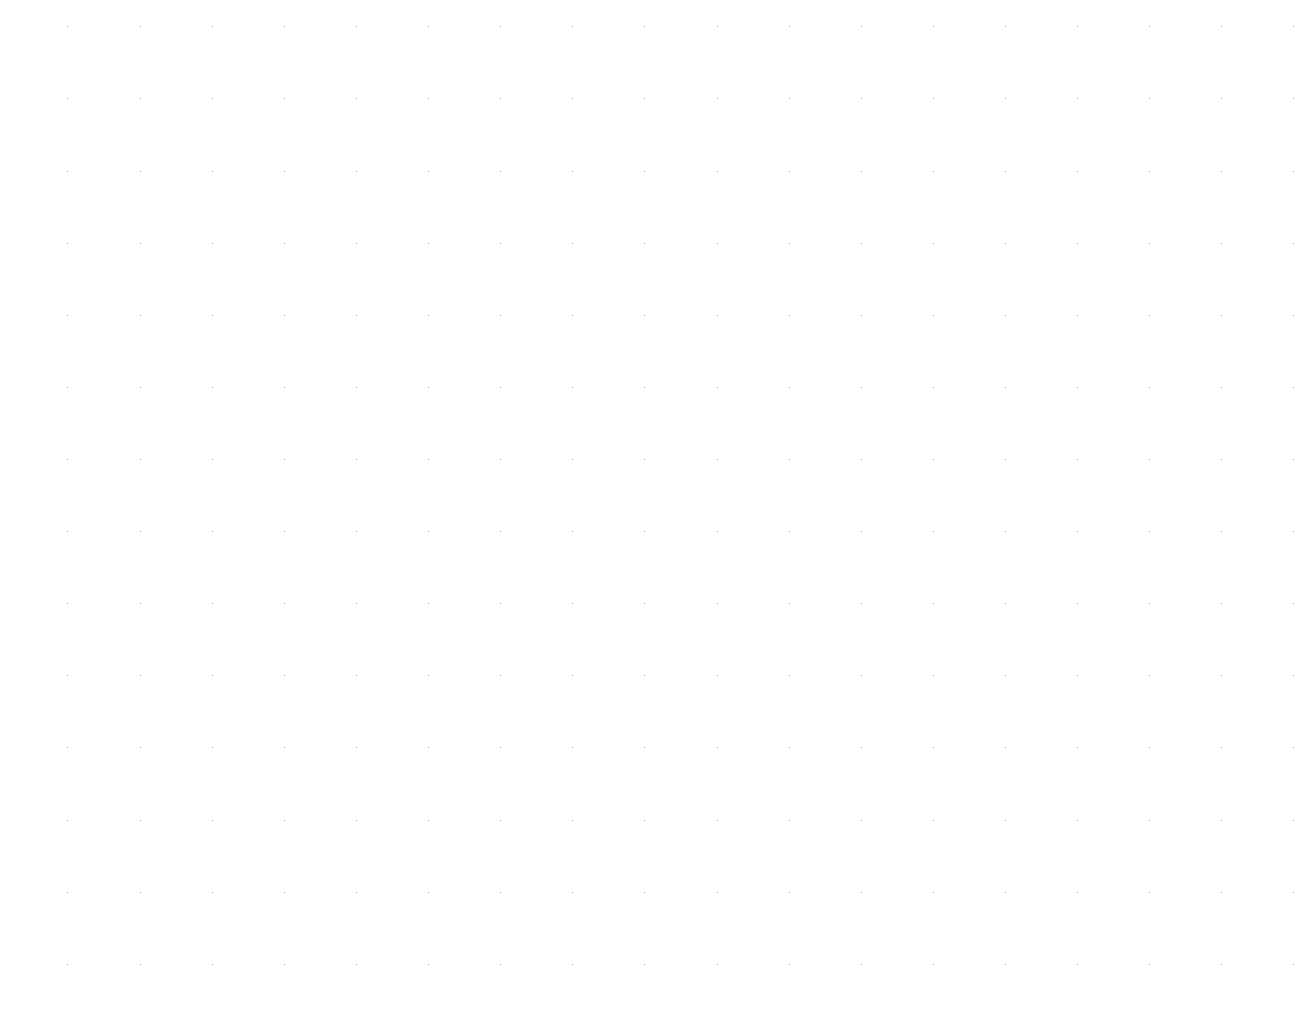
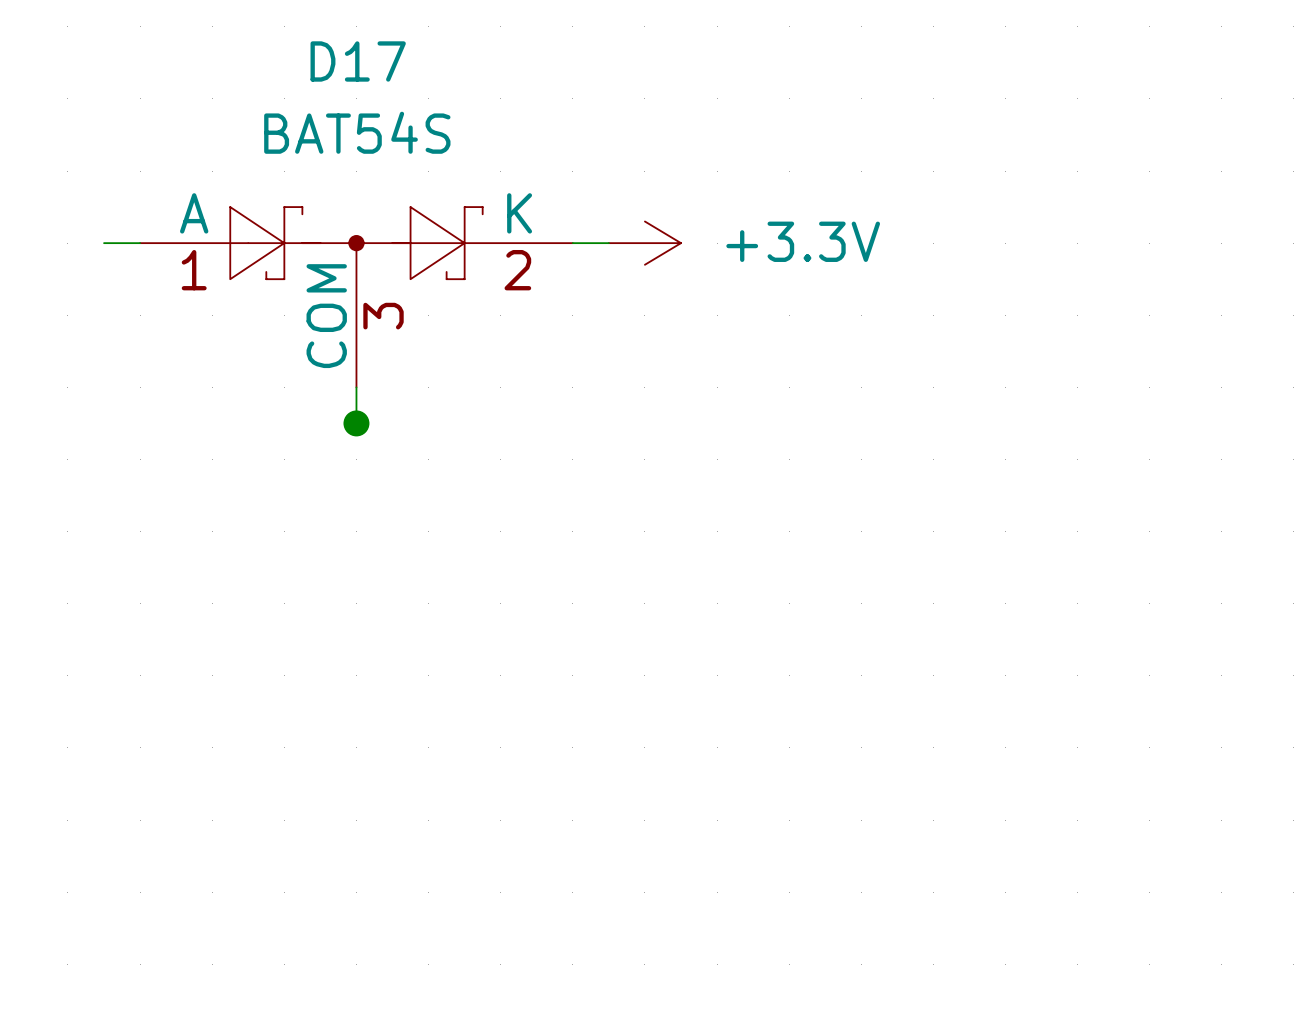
wire: none -> (104, 243) (140, 243)
wire: none -> (572, 243) (608, 243)
power symbol: none -> +3.3V (644, 243)
D17: none -> BAT54S (356, 297)
wire: none -> (356, 387) (356, 423)
junction: none -> (356, 423)

